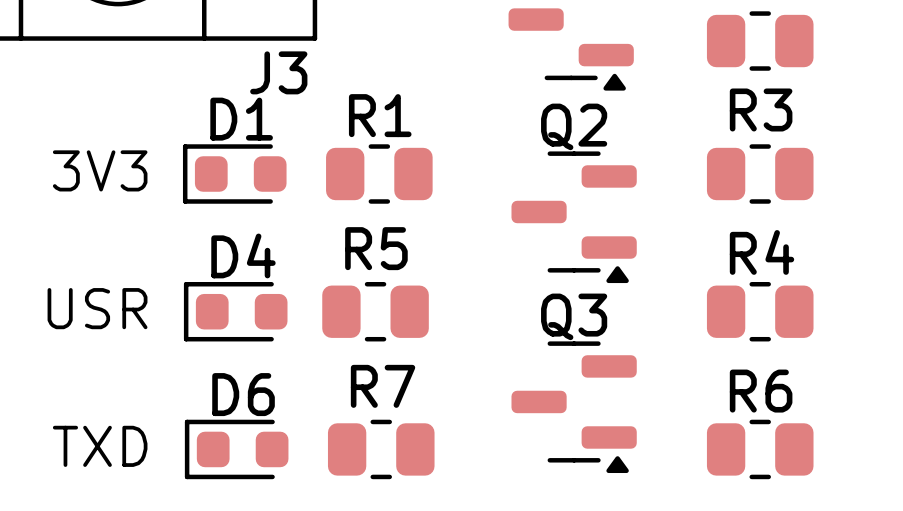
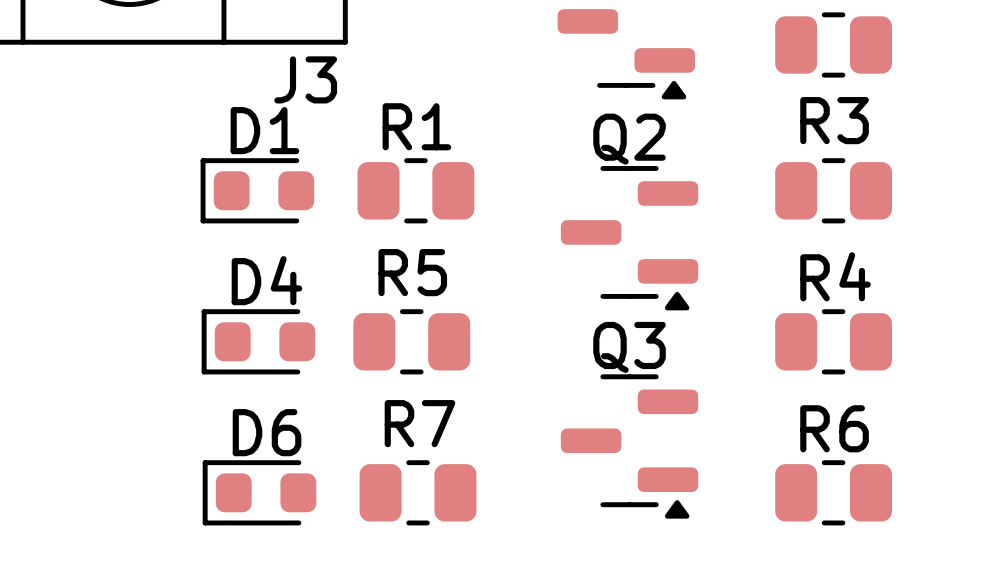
text: 3V3 (100, 170) -> none
text: USR (97, 308) -> none
text: TXD (100, 446) -> none

